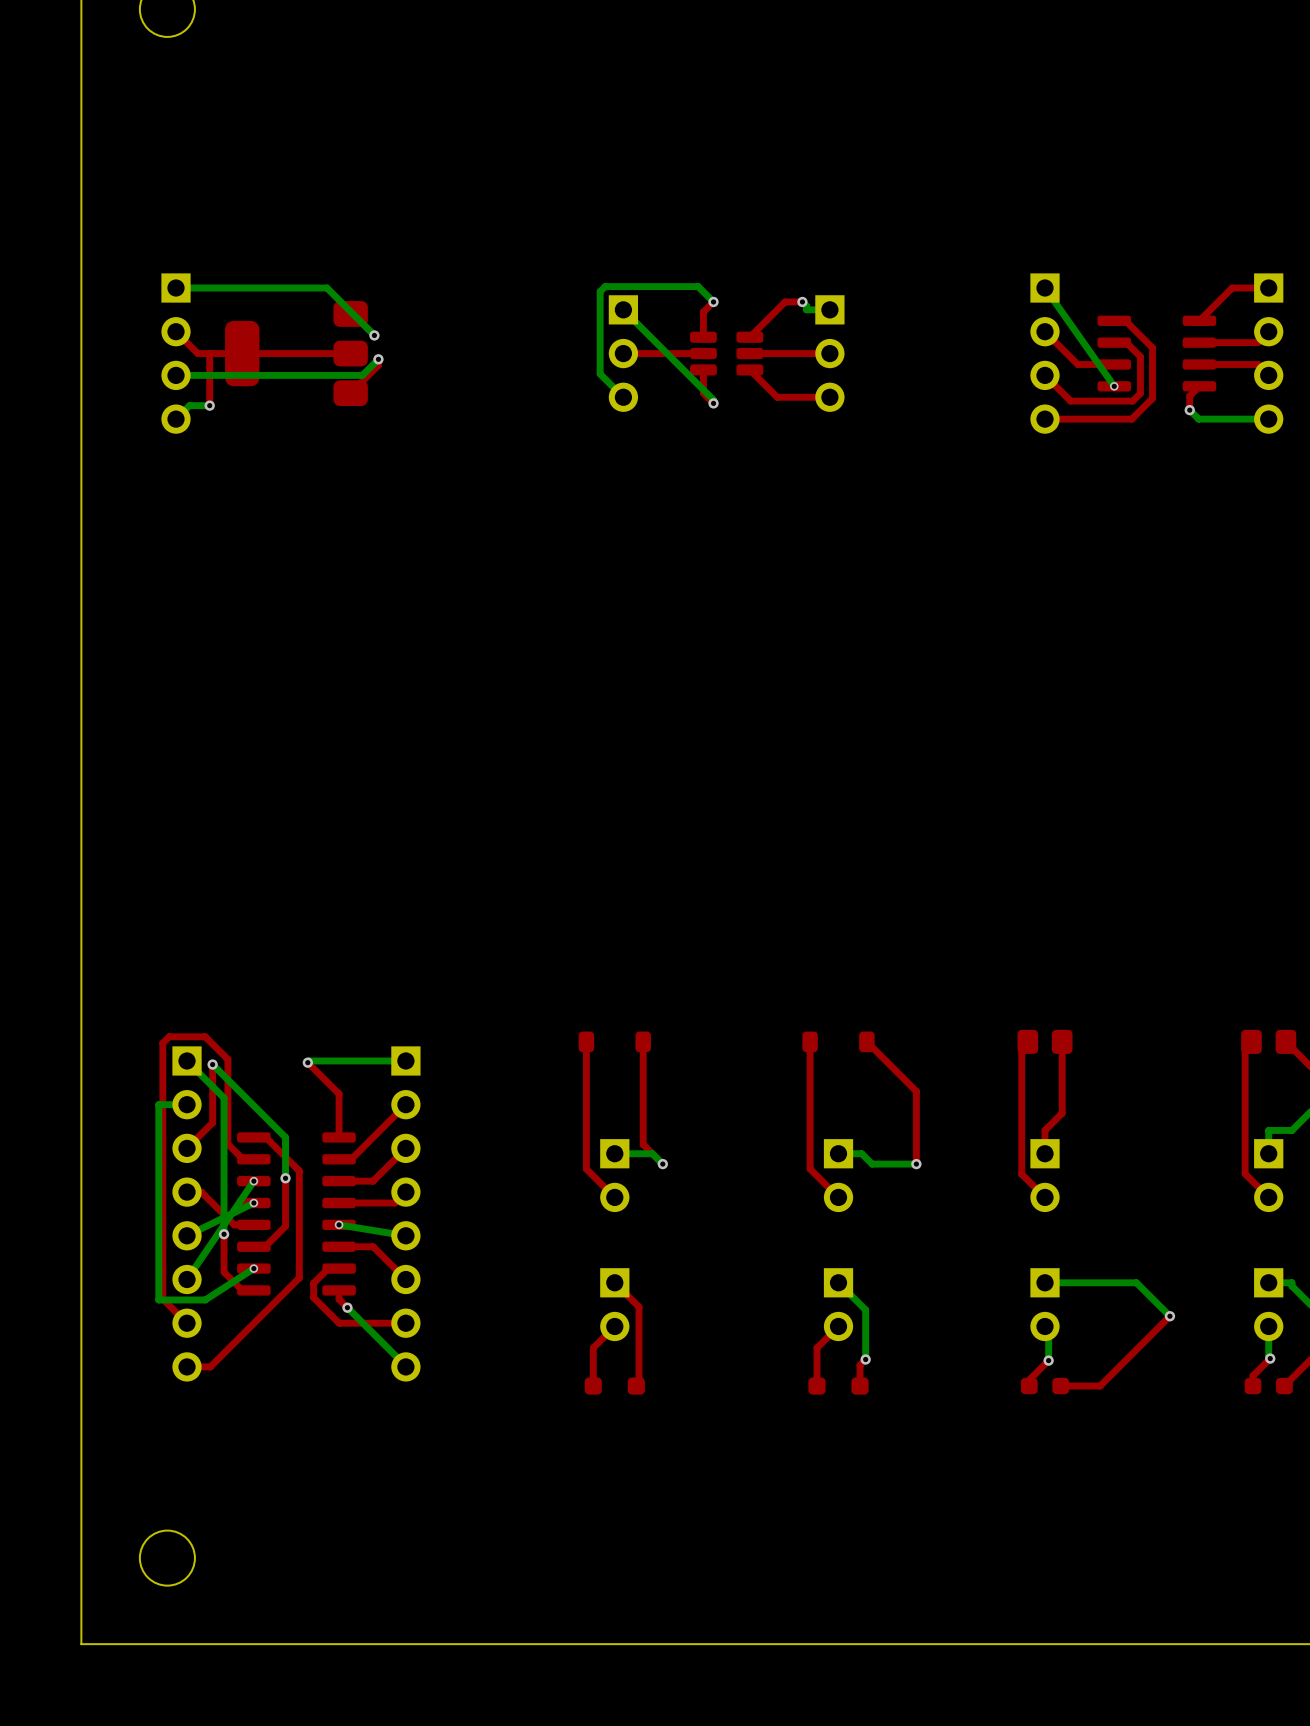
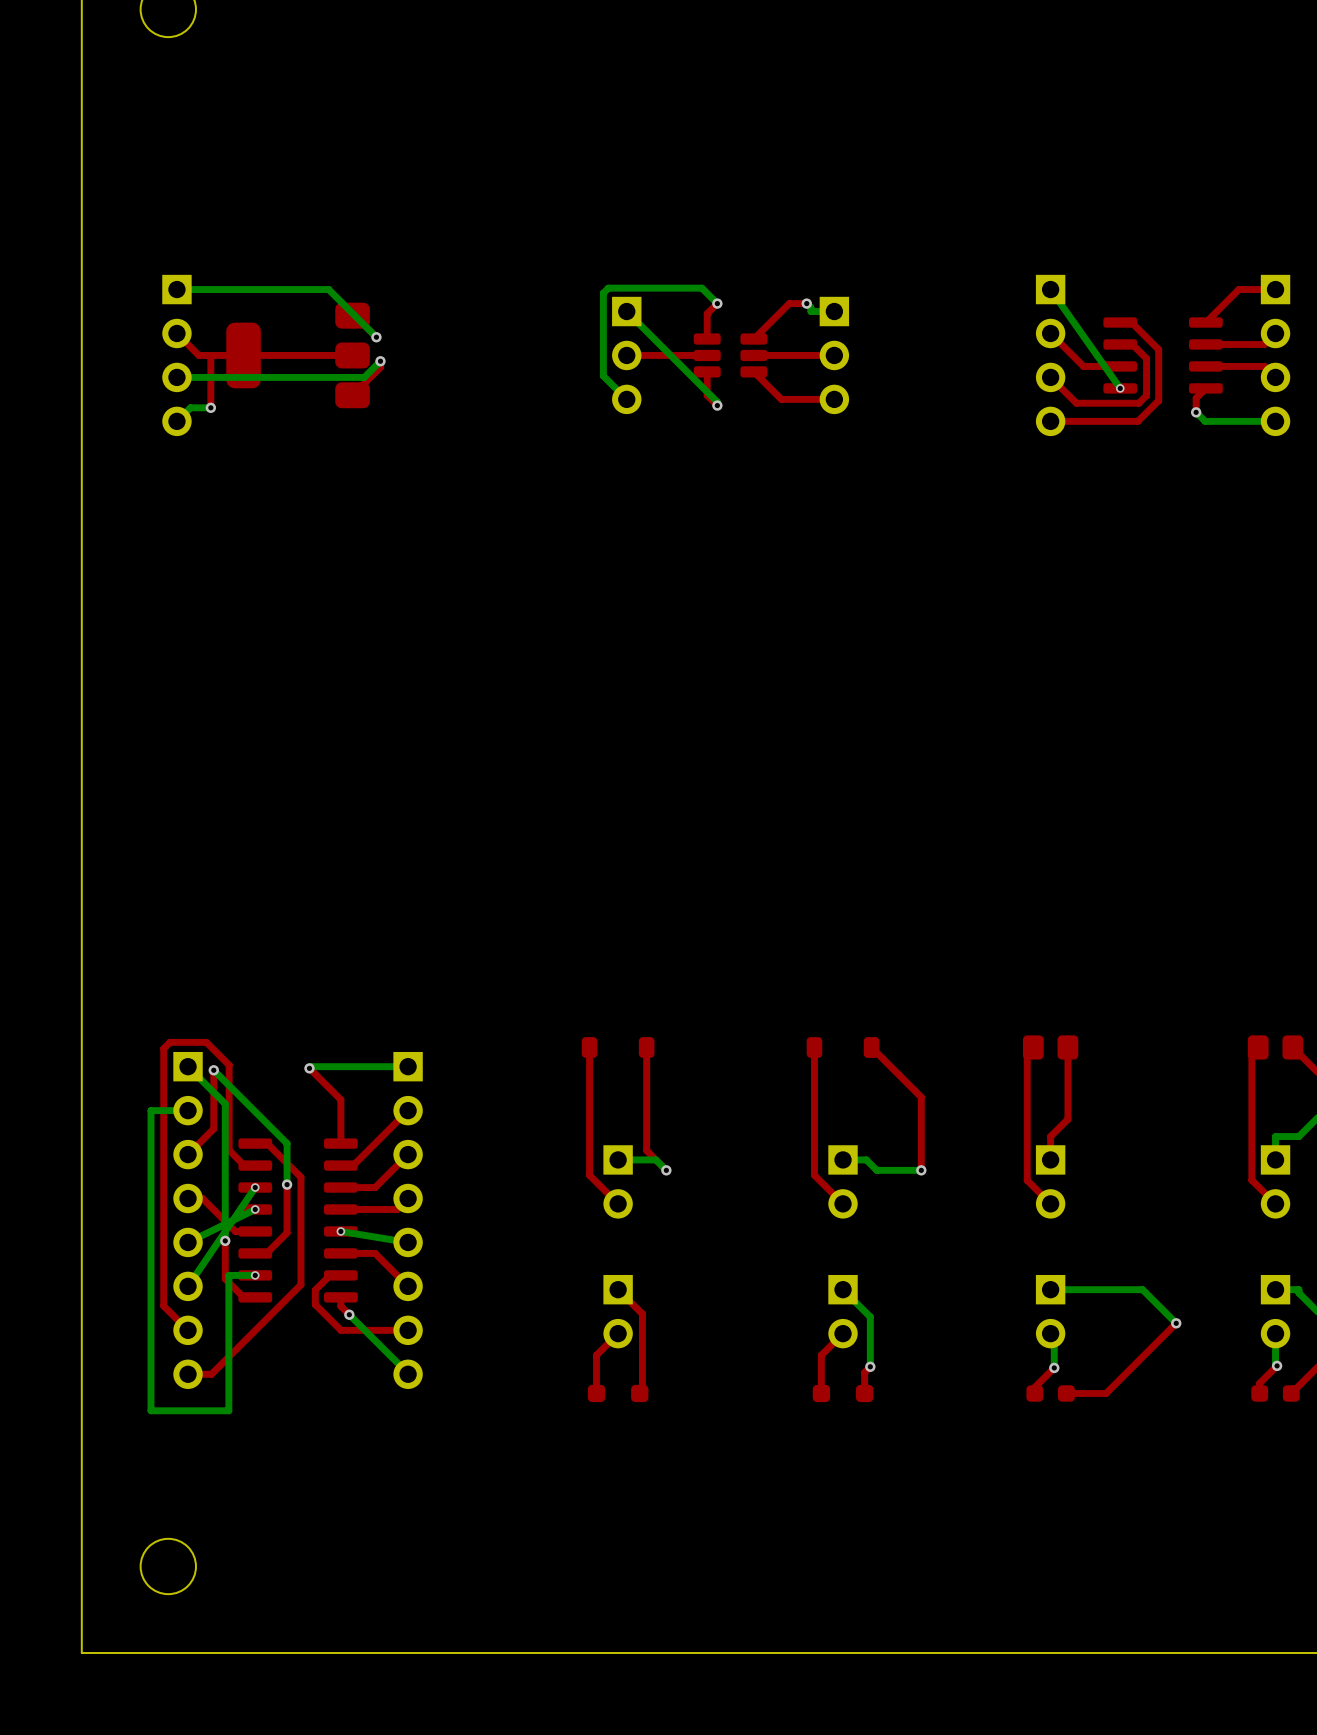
bottom track: (158, 1104) (158, 1299) (205, 1299) (253, 1268) -> (159, 1110) (151, 1110) (151, 1410) (228, 1410) (228, 1275) (255, 1275)

